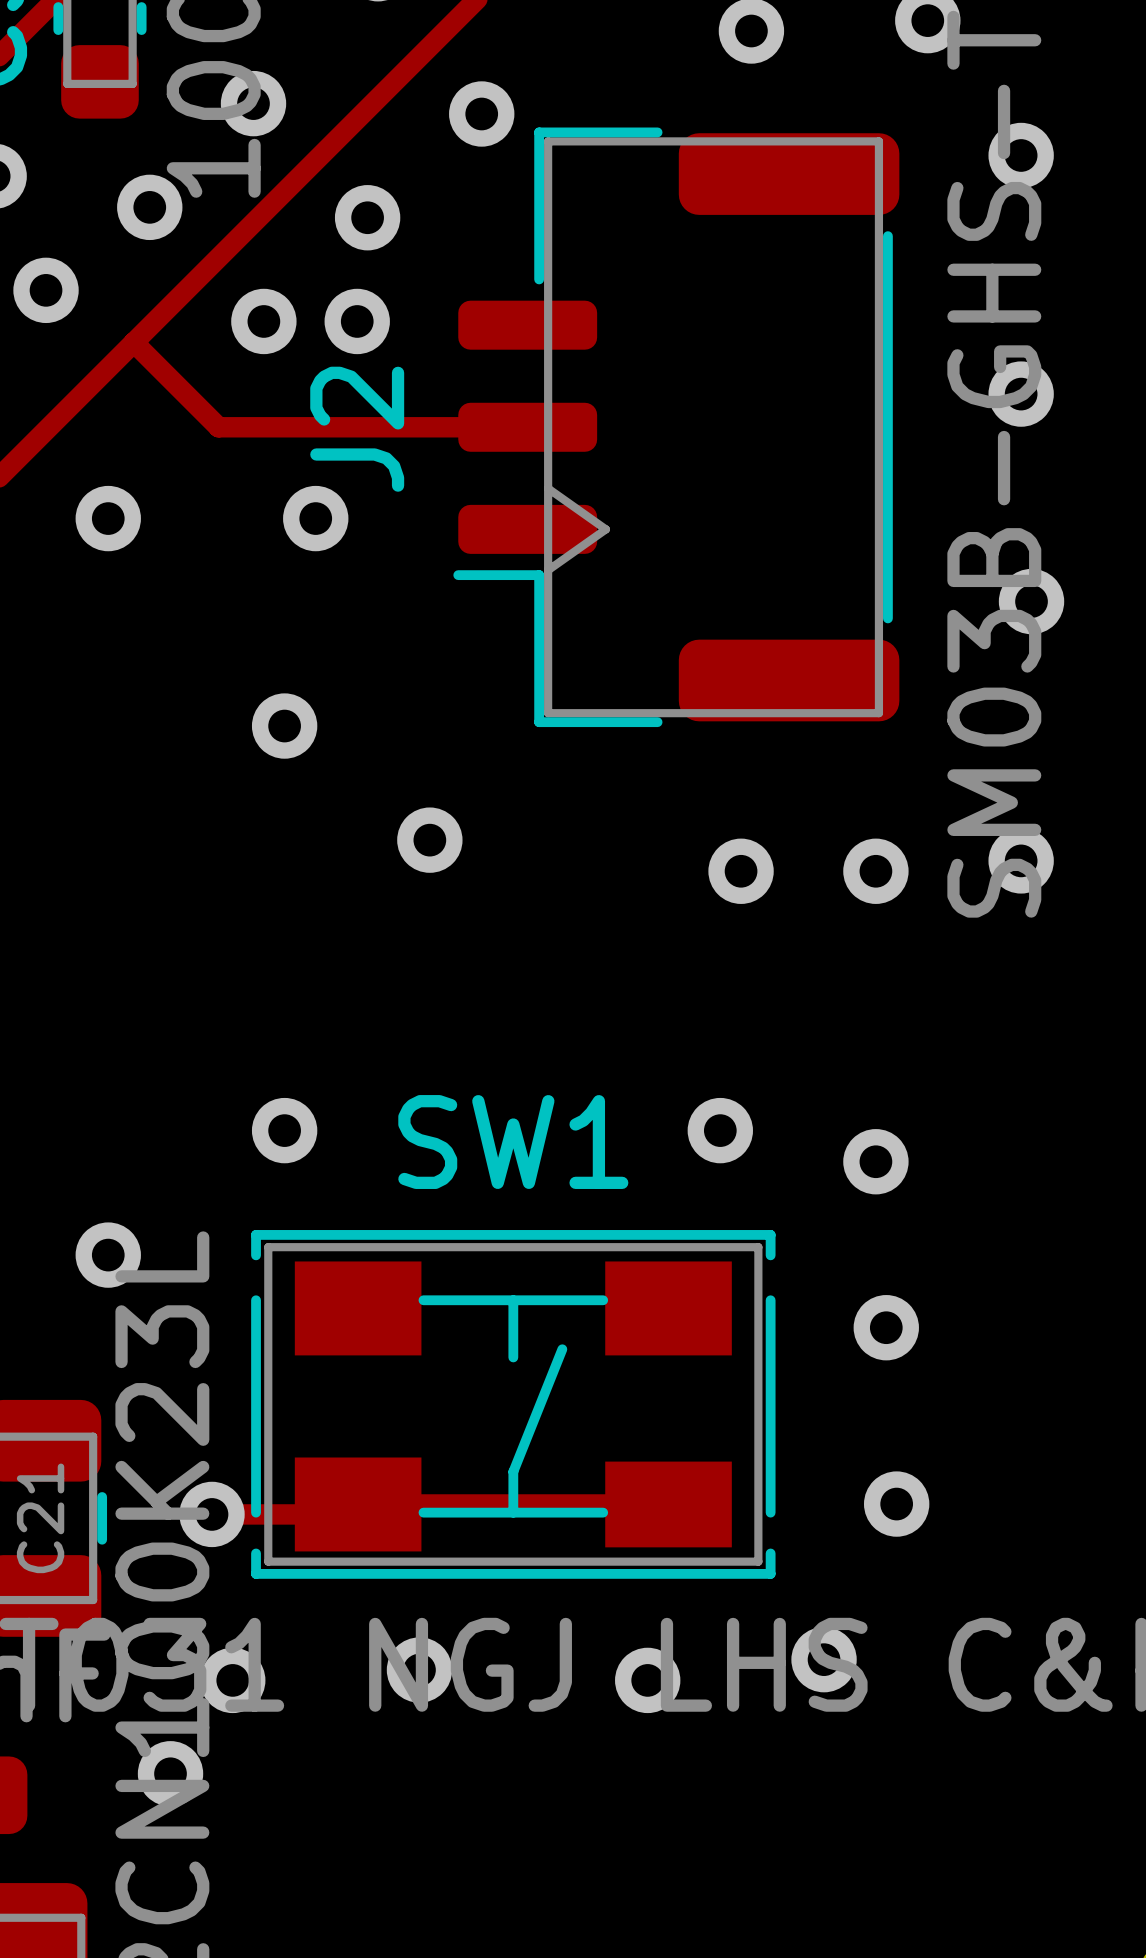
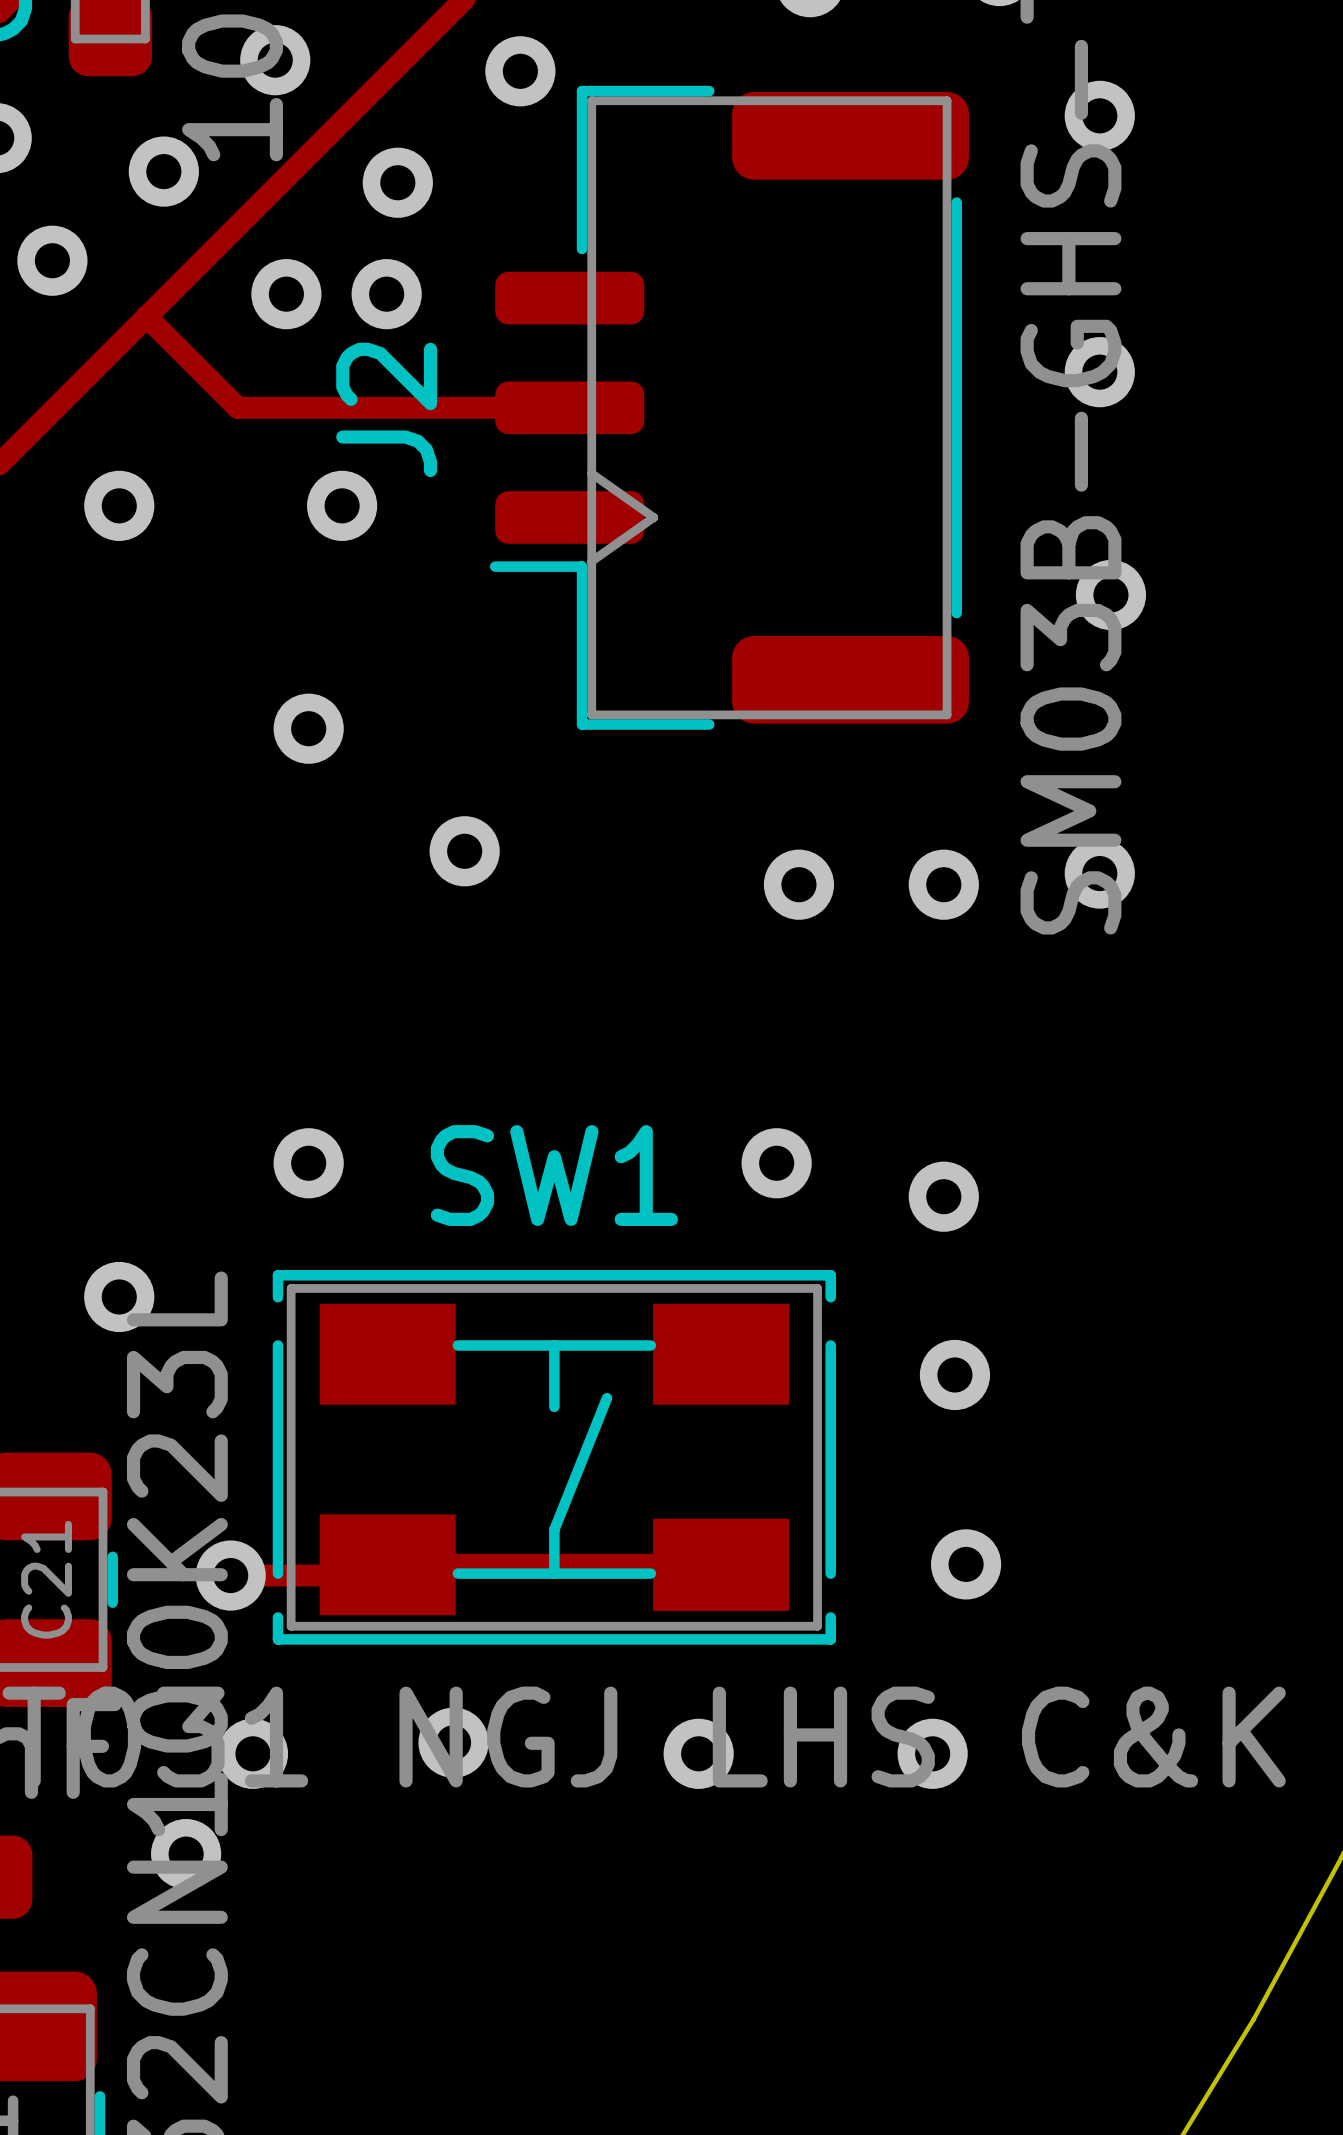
via position: (824, 1659) -> (932, 1753)

